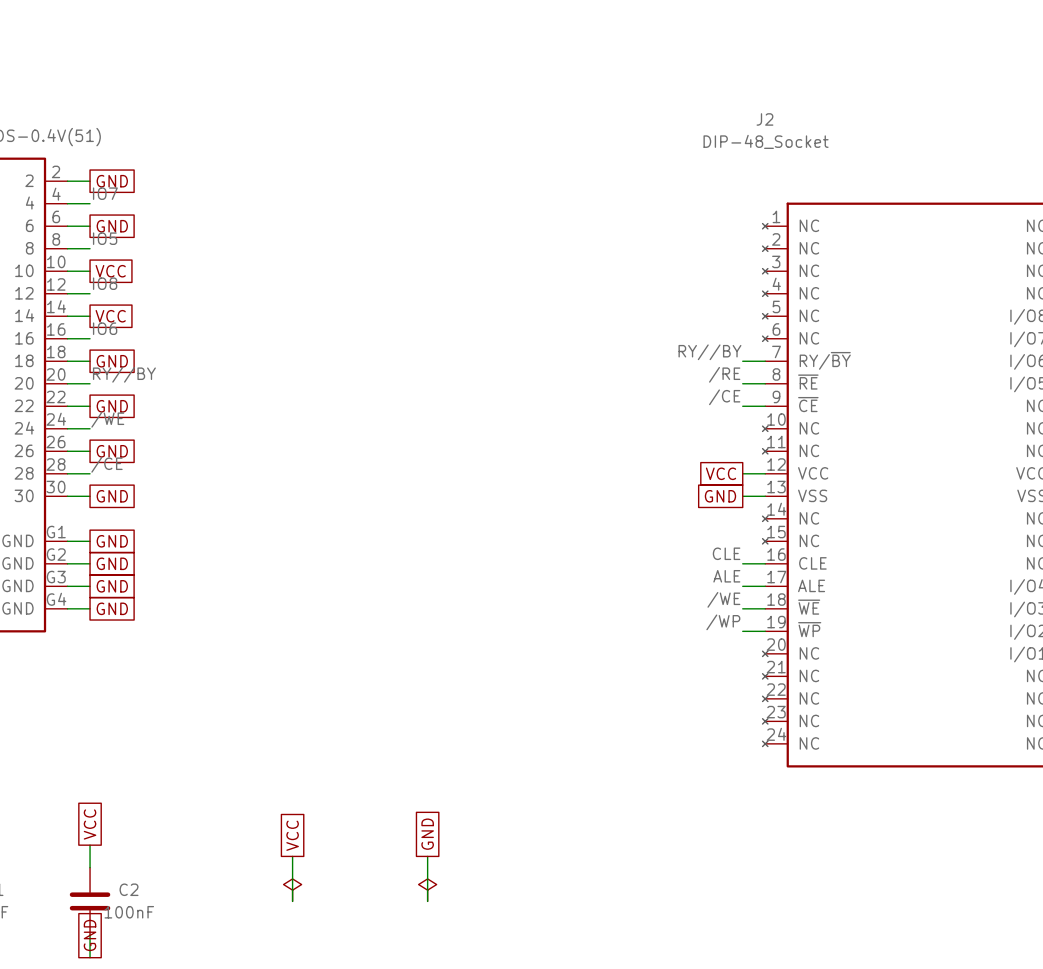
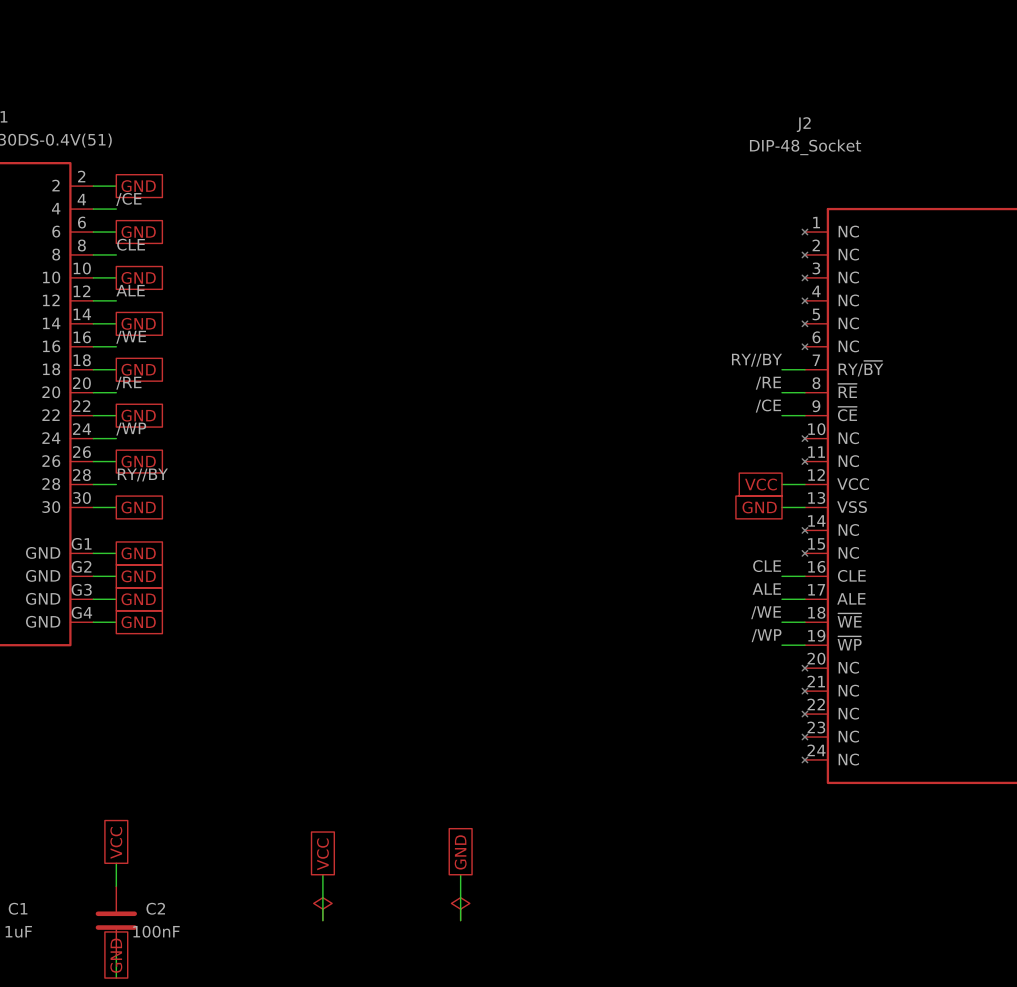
label: IO7 (105, 193) -> /CE (128, 199)
label: IO5 (105, 238) -> CLE (131, 244)
global label: VCC (110, 271) -> GND (138, 277)
label: IO8 (105, 283) -> ALE (130, 290)
global label: VCC (110, 316) -> GND (138, 323)
label: IO6 (105, 328) -> /WE (131, 337)
label: RY//BY (124, 374) -> /RE (128, 383)
label: /WE (107, 419) -> /WP (131, 429)
label: /CE (106, 464) -> RY//BY (142, 475)

